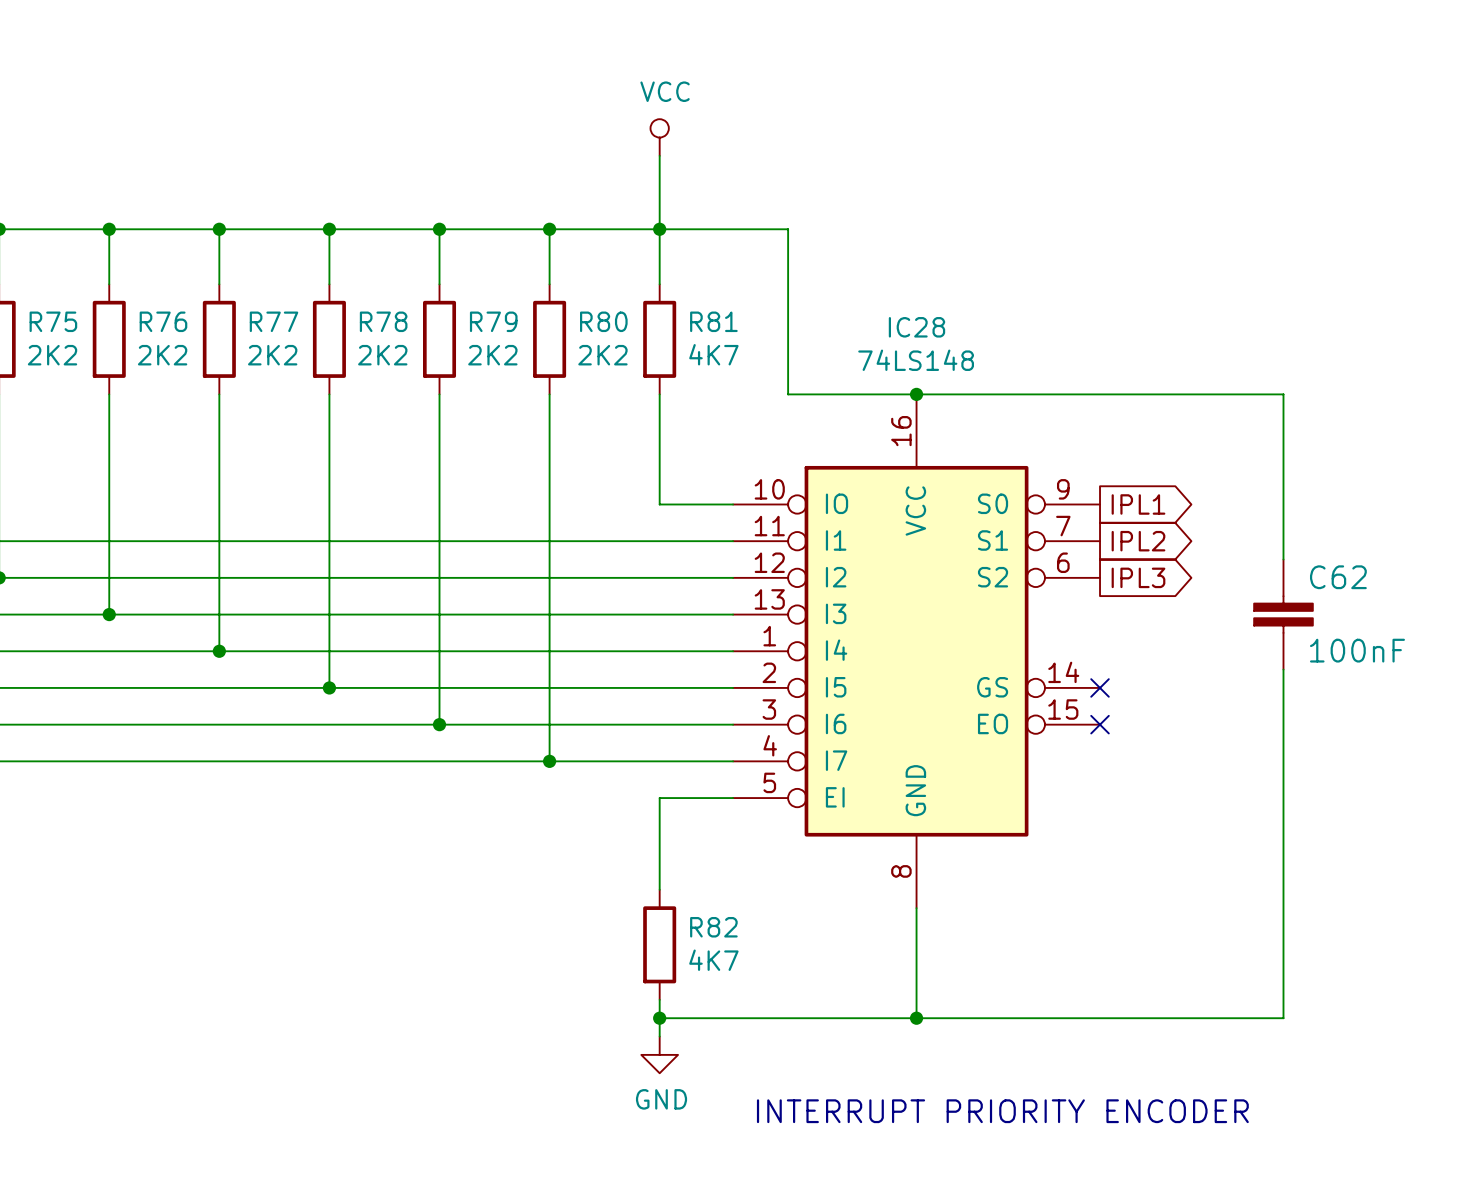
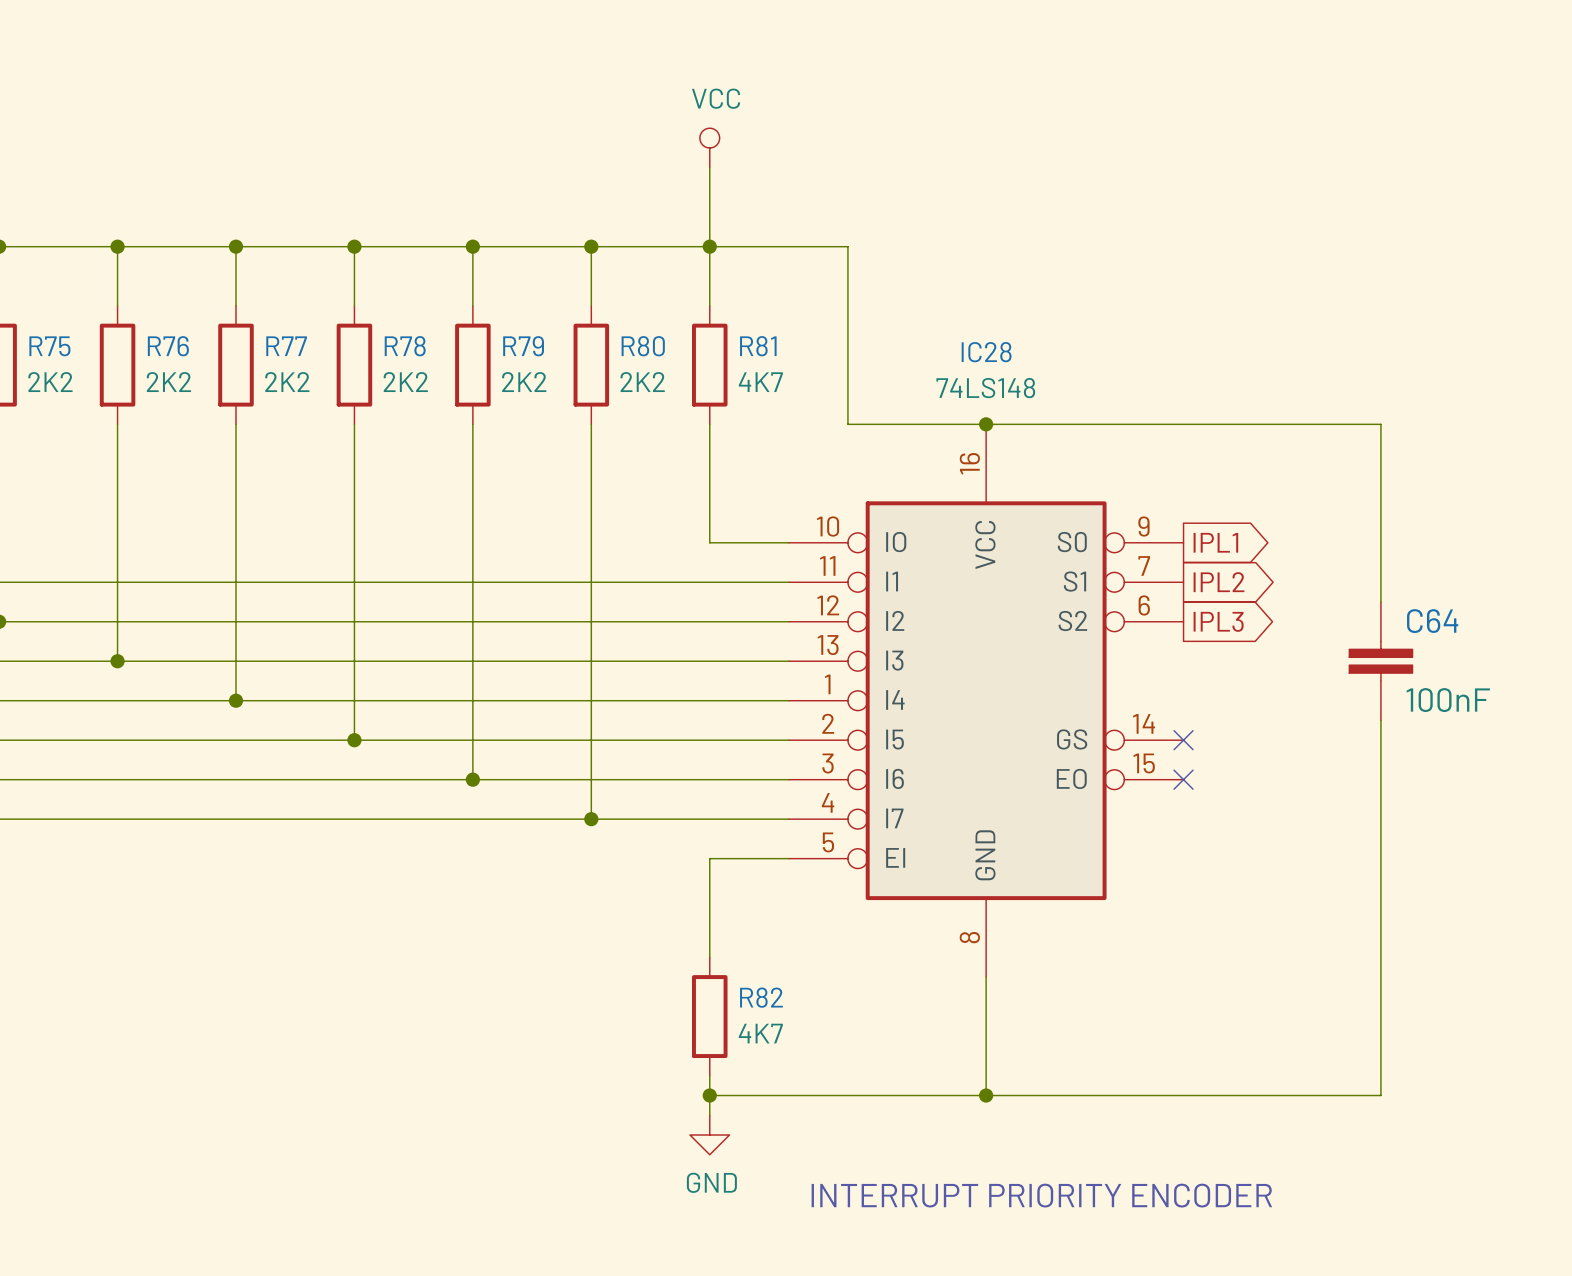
C62 name: C62 (1338, 577) -> C64 (1432, 621)

